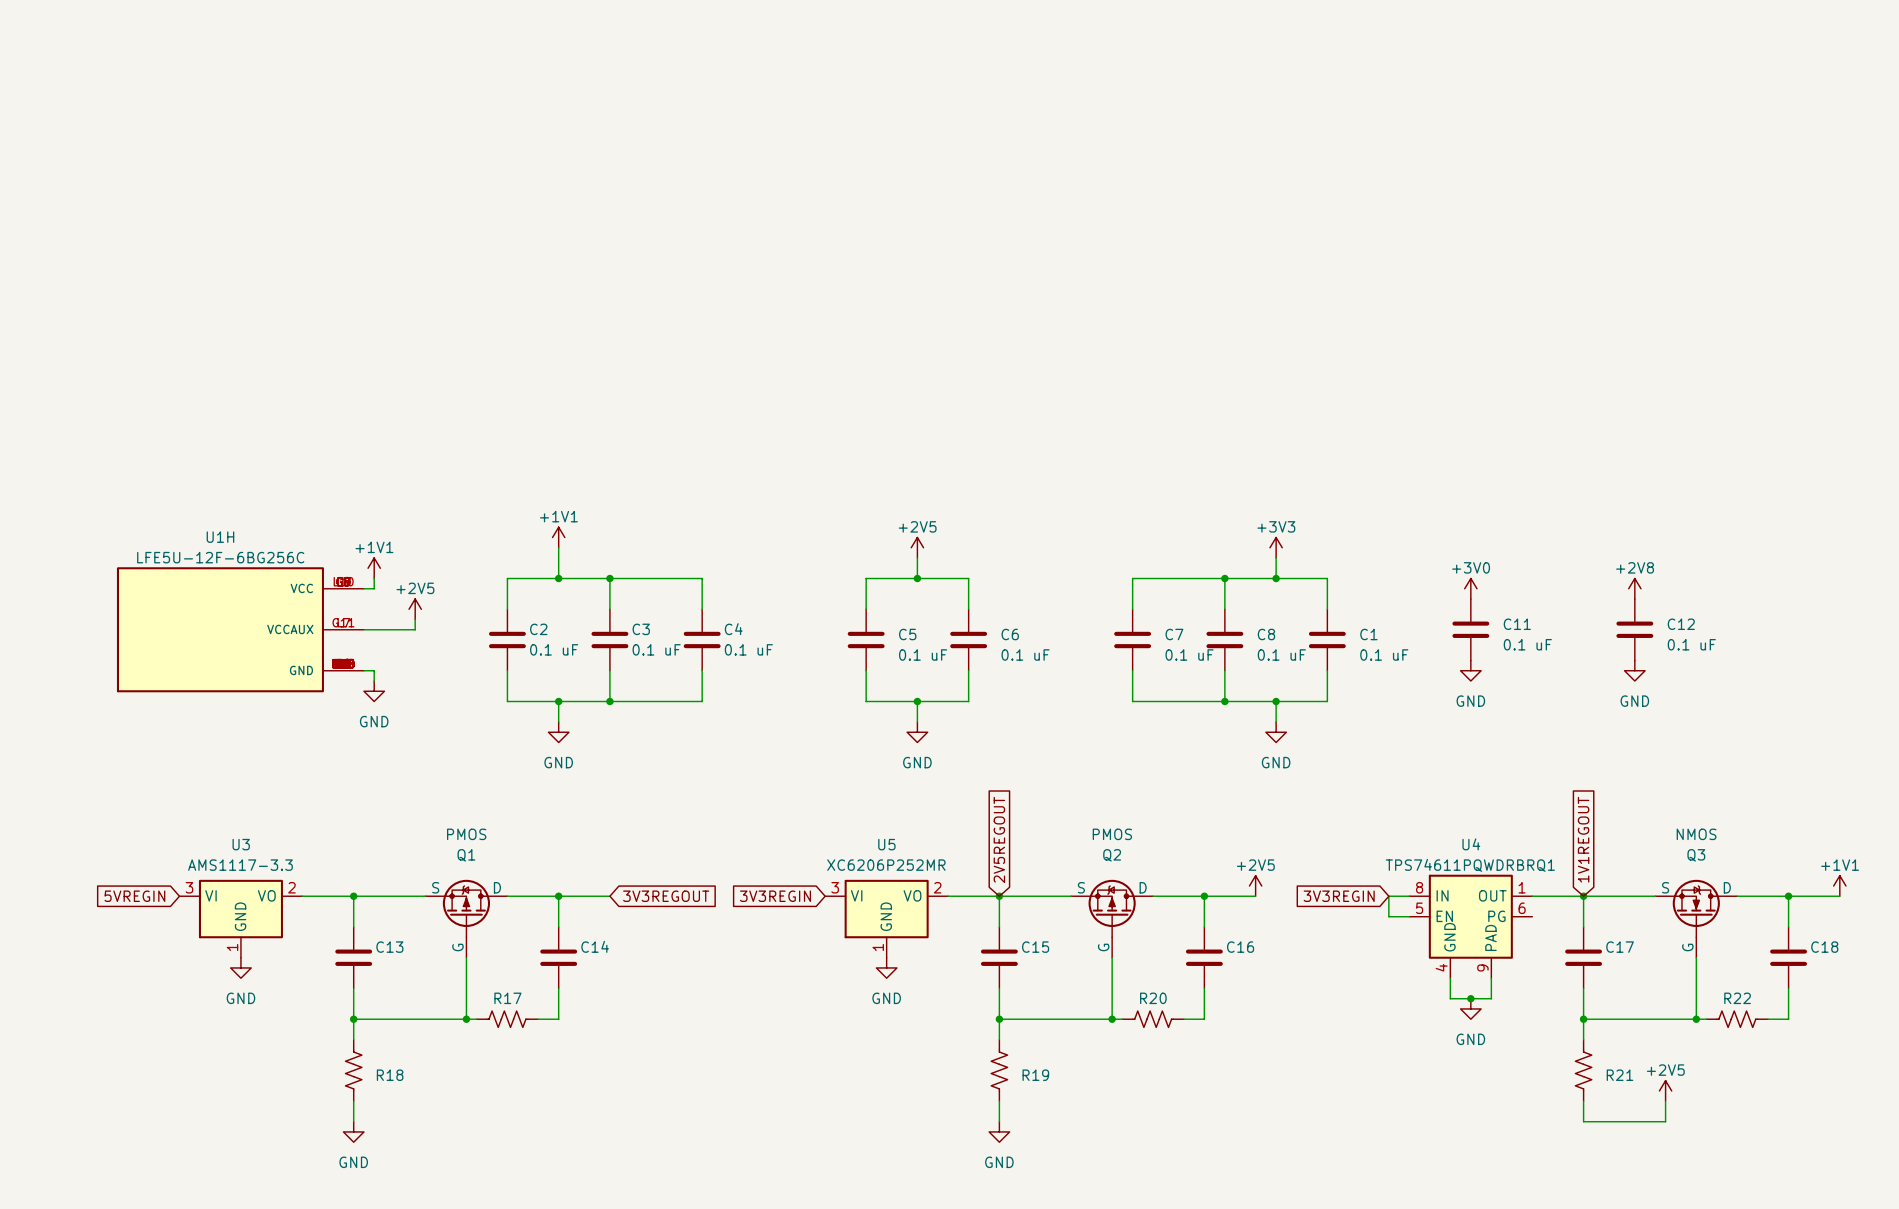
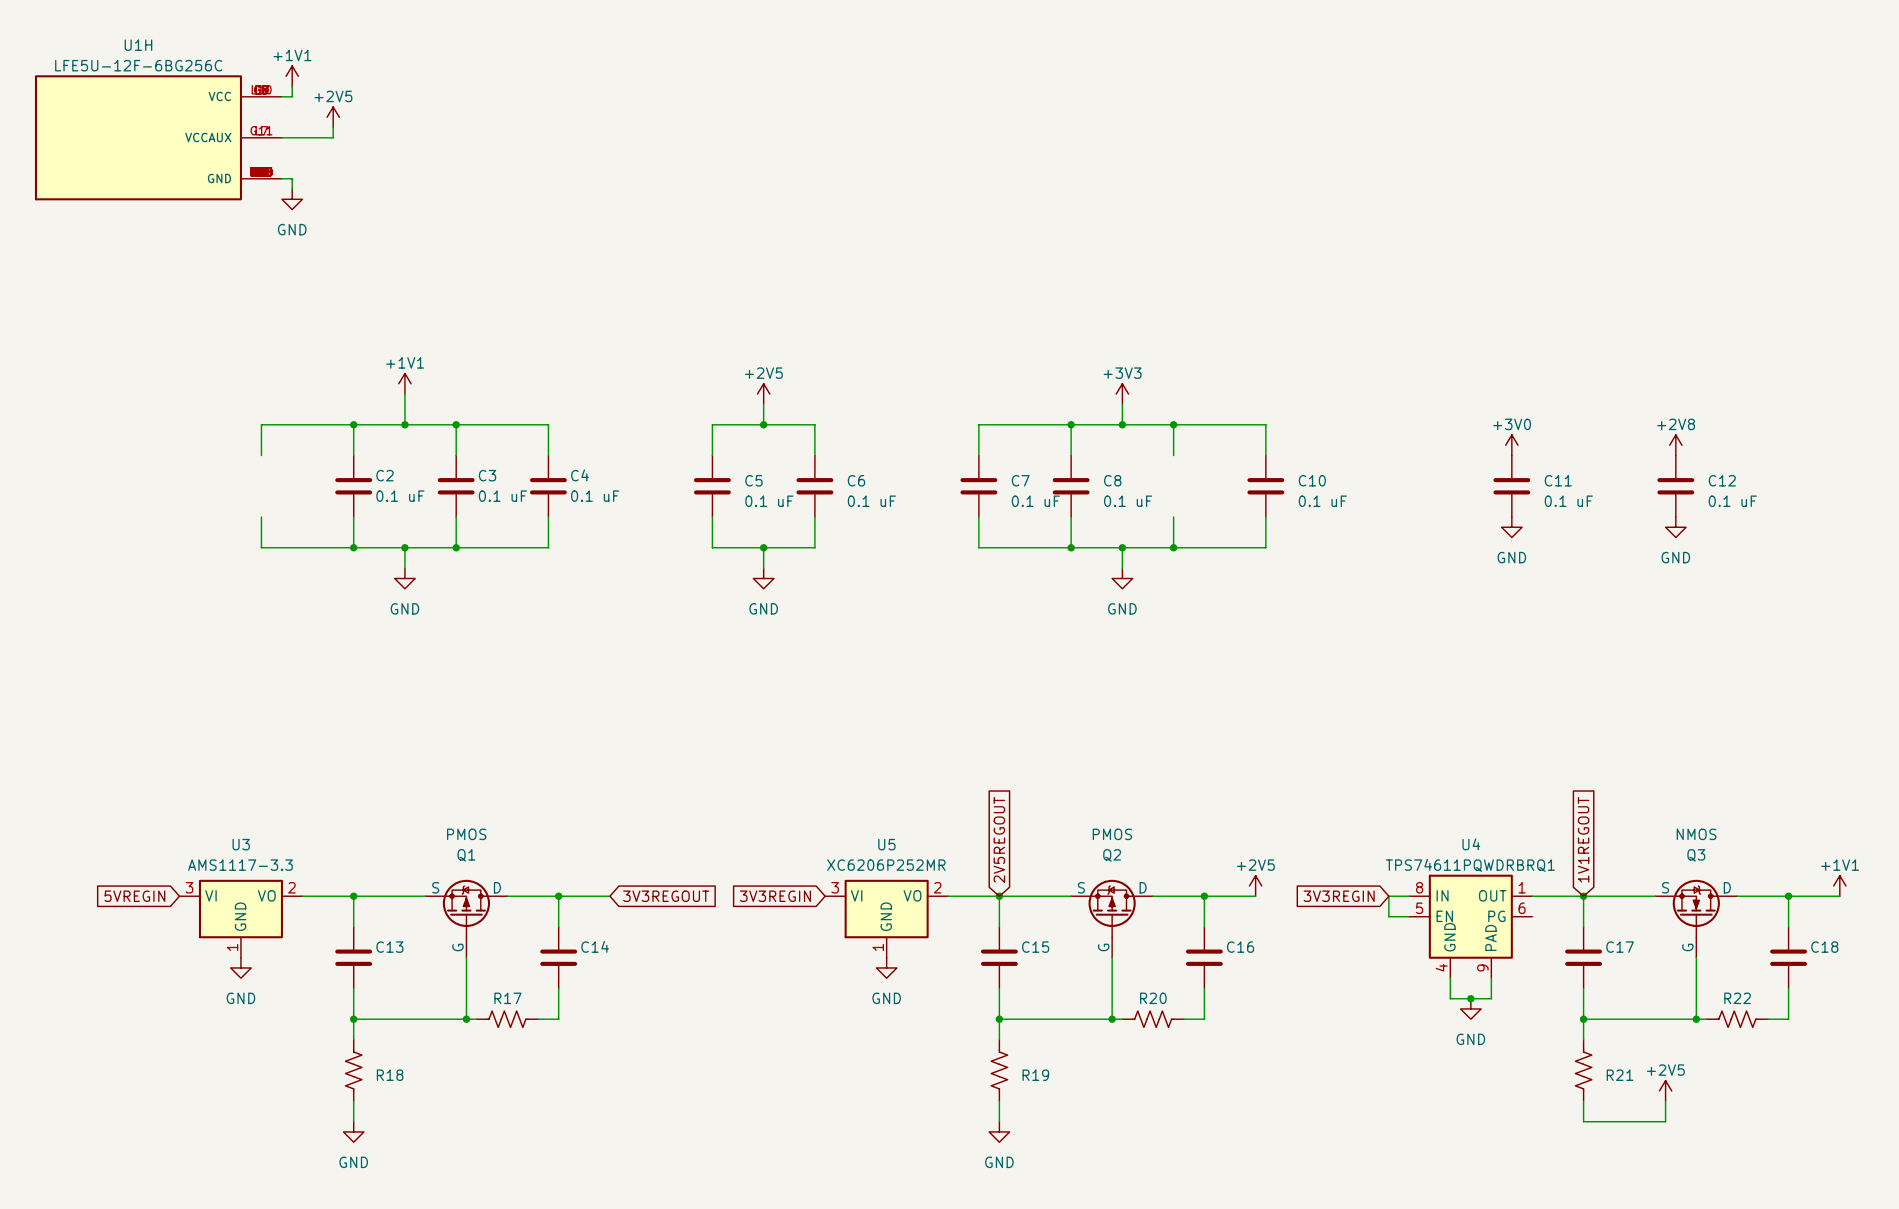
power symbol: none -> +1V1 (292, 76)
wire: none -> (292, 86) (292, 96) (281, 96)
power symbol: none -> +2V5 (333, 117)
wire: none -> (333, 127) (333, 137) (281, 137)
wire: none -> (281, 178) (292, 178) (292, 189)
power symbol: none -> GND (292, 199)
power symbol: none -> +1V1 (404, 383)
wire: none -> (404, 394) (404, 424)
power symbol: none -> +2V5 (763, 394)
power symbol: none -> +3V3 (1122, 394)
wire: none -> (763, 404) (763, 424)
wire: none -> (1122, 404) (1122, 424)
wire: none -> (353, 424) (353, 455)
junction: none -> (353, 424)
junction: none -> (404, 424)
junction: none -> (456, 424)
junction: none -> (763, 424)
wire: none -> (1071, 424) (1071, 455)
junction: none -> (1071, 424)
junction: none -> (1122, 424)
junction: none -> (1173, 424)
wire: none -> (261, 455) (261, 424) (548, 424) (548, 455)
wire: none -> (712, 455) (712, 424) (814, 424) (814, 455)
wire: none -> (978, 455) (978, 424) (1265, 424) (1265, 455)
C10: none -> 0.1 uF (1265, 486)
wire: none -> (261, 517) (261, 547) (548, 547) (548, 517)
wire: none -> (353, 517) (353, 547)
wire: none -> (712, 517) (712, 547) (814, 547) (814, 517)
wire: none -> (978, 517) (978, 547) (1265, 547) (1265, 517)
wire: none -> (1071, 517) (1071, 547)
power symbol: none -> GND (1511, 527)
power symbol: none -> GND (1675, 527)
power symbol: +1V1 (558, 537) -> none
junction: none -> (353, 547)
wire: none -> (404, 547) (404, 568)
junction: none -> (404, 547)
junction: none -> (456, 547)
wire: (558, 547) (558, 578) -> (456, 424) (456, 455)
junction: none -> (763, 547)
power symbol: +2V5 (917, 547) -> none
junction: none -> (1071, 547)
junction: none -> (1122, 547)
junction: none -> (1173, 547)
power symbol: +3V3 (1276, 547) -> none
wire: (917, 558) (917, 578) -> (763, 547) (763, 568)
wire: (1276, 558) (1276, 578) -> (1122, 547) (1122, 568)
power symbol: +1V1 (374, 568) -> none
wire: (374, 578) (374, 588) (363, 588) -> none
power symbol: none -> GND (404, 578)
junction: (558, 578) -> none
wire: (609, 578) (609, 609) -> (456, 517) (456, 547)
junction: (609, 578) -> none
power symbol: none -> GND (763, 578)
junction: (917, 578) -> none
power symbol: none -> GND (1122, 578)
wire: (1224, 578) (1224, 609) -> (1173, 424) (1173, 455)
junction: (1224, 578) -> none
junction: (1276, 578) -> none
power symbol position: +3V0 (1470, 588) -> +3V0 (1511, 445)
power symbol position: +2V8 (1634, 588) -> +2V8 (1675, 445)
power symbol: +2V5 (415, 609) -> none
wire: (507, 609) (507, 578) (702, 578) (702, 609) -> none
wire: (866, 609) (866, 578) (968, 578) (968, 609) -> none
wire: (1132, 609) (1132, 578) (1327, 578) (1327, 609) -> none
wire: (415, 619) (415, 629) (363, 629) -> none
U1H position: (240, 629) -> (158, 137)
C11 position: (1470, 629) -> (1511, 486)
C12 position: (1634, 629) -> (1675, 486)
C2 position: (507, 640) -> (353, 486)
C3 position: (609, 640) -> (456, 486)
C4 position: (702, 640) -> (548, 486)
C5 position: (866, 640) -> (712, 486)
C6 position: (968, 640) -> (814, 486)
C7 position: (1132, 640) -> (978, 486)
C8 position: (1224, 640) -> (1071, 486)
C1: 0.1 uF (1327, 640) -> none
wire: (363, 670) (374, 670) (374, 681) -> none
wire: (507, 670) (507, 701) (702, 701) (702, 670) -> none
wire: (609, 670) (609, 701) -> none
wire: (866, 670) (866, 701) (968, 701) (968, 670) -> none
wire: (1132, 670) (1132, 701) (1327, 701) (1327, 670) -> none
wire: (1224, 670) (1224, 701) -> (1173, 517) (1173, 547)
power symbol: GND (1470, 670) -> none
power symbol: GND (1634, 670) -> none
power symbol: GND (374, 691) -> none
wire: (558, 701) (558, 722) -> none
junction: (558, 701) -> none
junction: (609, 701) -> none
wire: (917, 701) (917, 722) -> none
junction: (917, 701) -> none
junction: (1224, 701) -> none
wire: (1276, 701) (1276, 722) -> none
junction: (1276, 701) -> none
power symbol: GND (558, 732) -> none
power symbol: GND (917, 732) -> none
power symbol: GND (1276, 732) -> none

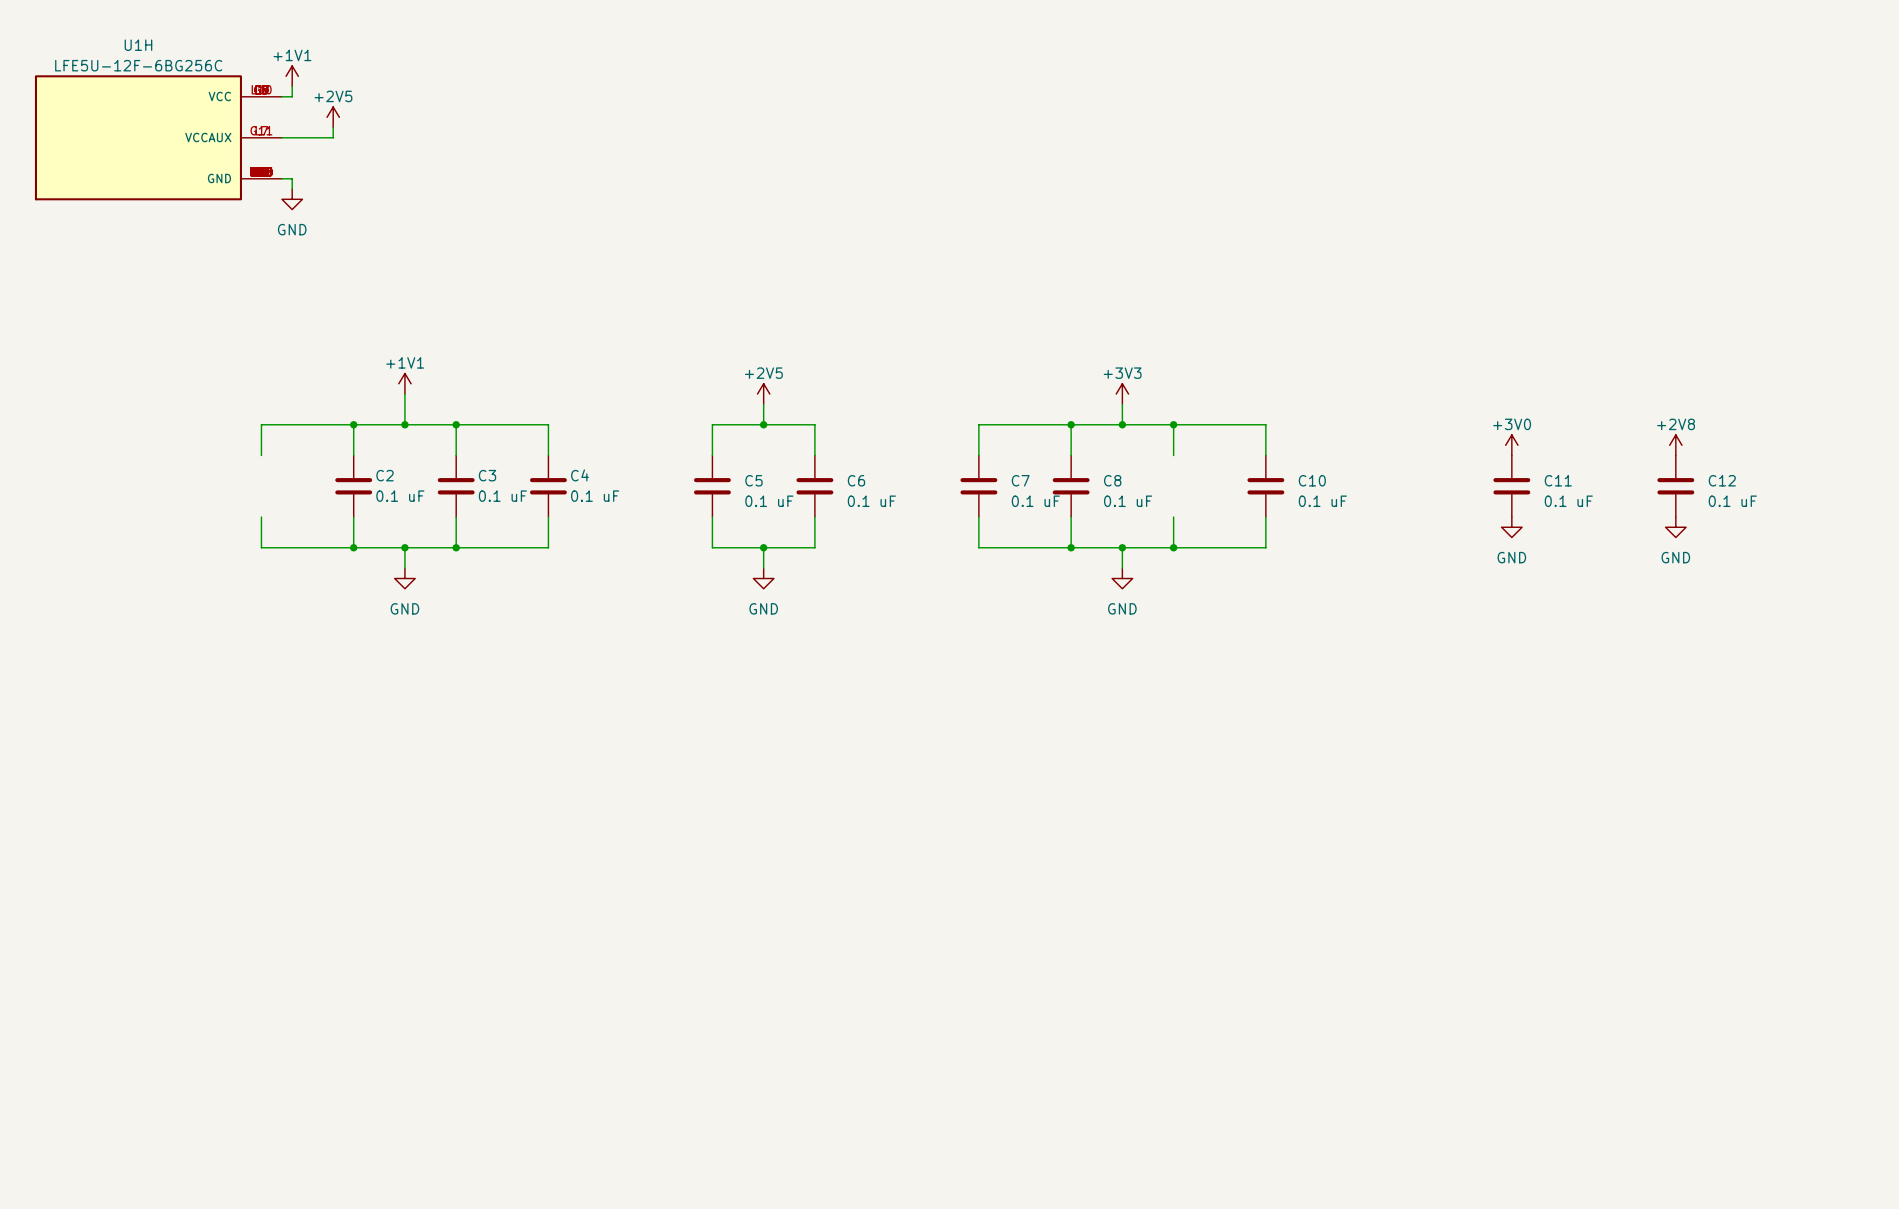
global label: 2V5REGOUT (999, 839) -> none
global label: 1V1REGOUT (1583, 839) -> none
power symbol: +2V5 (1255, 885) -> none
power symbol: +1V1 (1839, 885) -> none
global label: 5VREGIN (134, 896) -> none
wire: (302, 896) (425, 896) -> none
wire: (353, 896) (353, 926) -> none
junction: (353, 896) -> none
wire: (507, 896) (609, 896) -> none
wire: (558, 896) (558, 926) -> none
junction: (558, 896) -> none
global label: 3V3REGOUT (666, 896) -> none
global label: 3V3REGIN (775, 896) -> none
wire: (948, 896) (1071, 896) -> none
wire: (999, 896) (999, 926) -> none
junction: (999, 896) -> none
wire: (1153, 896) (1255, 896) -> none
wire: (1204, 896) (1204, 926) -> none
junction: (1204, 896) -> none
global label: 3V3REGIN (1339, 896) -> none
wire: (1409, 896) (1388, 896) (1388, 916) (1409, 916) -> none
wire: (1532, 896) (1655, 896) -> none
wire: (1583, 896) (1583, 926) -> none
junction: (1583, 896) -> none
wire: (1737, 896) (1839, 896) -> none
wire: (1788, 896) (1788, 926) -> none
junction: (1788, 896) -> none
U3: AMS1117-3.3 (240, 918) -> none
Q1: PMOS (466, 918) -> none
U5: XC6206P252MR (886, 918) -> none
Q2: PMOS (1112, 918) -> none
Q3: NMOS (1696, 918) -> none
U4: TPS74611PQWDRBRQ1 (1470, 926) -> none
C13: (353, 957) -> none
wire: (466, 957) (466, 1019) -> none
C14: (558, 957) -> none
C15: (999, 957) -> none
wire: (1112, 957) (1112, 1019) -> none
C16: (1204, 957) -> none
C17: (1583, 957) -> none
wire: (1696, 957) (1696, 1019) -> none
C18: (1788, 957) -> none
power symbol: GND (240, 967) -> none
power symbol: GND (886, 967) -> none
wire: (1450, 978) (1450, 998) (1491, 998) (1491, 978) -> none
wire: (353, 988) (353, 1039) -> none
wire: (558, 988) (558, 1019) (538, 1019) -> none
wire: (999, 988) (999, 1039) -> none
wire: (1204, 988) (1204, 1019) (1183, 1019) -> none
wire: (1583, 988) (1583, 1039) -> none
wire: (1788, 988) (1788, 1019) (1768, 1019) -> none
junction: (1470, 998) -> none
power symbol: GND (1470, 1008) -> none
wire: (353, 1019) (476, 1019) -> none
junction: (353, 1019) -> none
junction: (466, 1019) -> none
R17: (507, 1019) -> none
wire: (999, 1019) (1122, 1019) -> none
junction: (999, 1019) -> none
junction: (1112, 1019) -> none
R20: (1153, 1019) -> none
wire: (1583, 1019) (1706, 1019) -> none
junction: (1583, 1019) -> none
junction: (1696, 1019) -> none
R22: (1737, 1019) -> none
R18: (353, 1070) -> none
R19: (999, 1070) -> none
R21: (1583, 1070) -> none
power symbol: +2V5 (1665, 1090) -> none
wire: (353, 1101) (353, 1121) -> none
wire: (999, 1101) (999, 1121) -> none
wire: (1583, 1101) (1583, 1121) (1665, 1121) (1665, 1101) -> none
power symbol: GND (353, 1131) -> none
power symbol: GND (999, 1131) -> none

